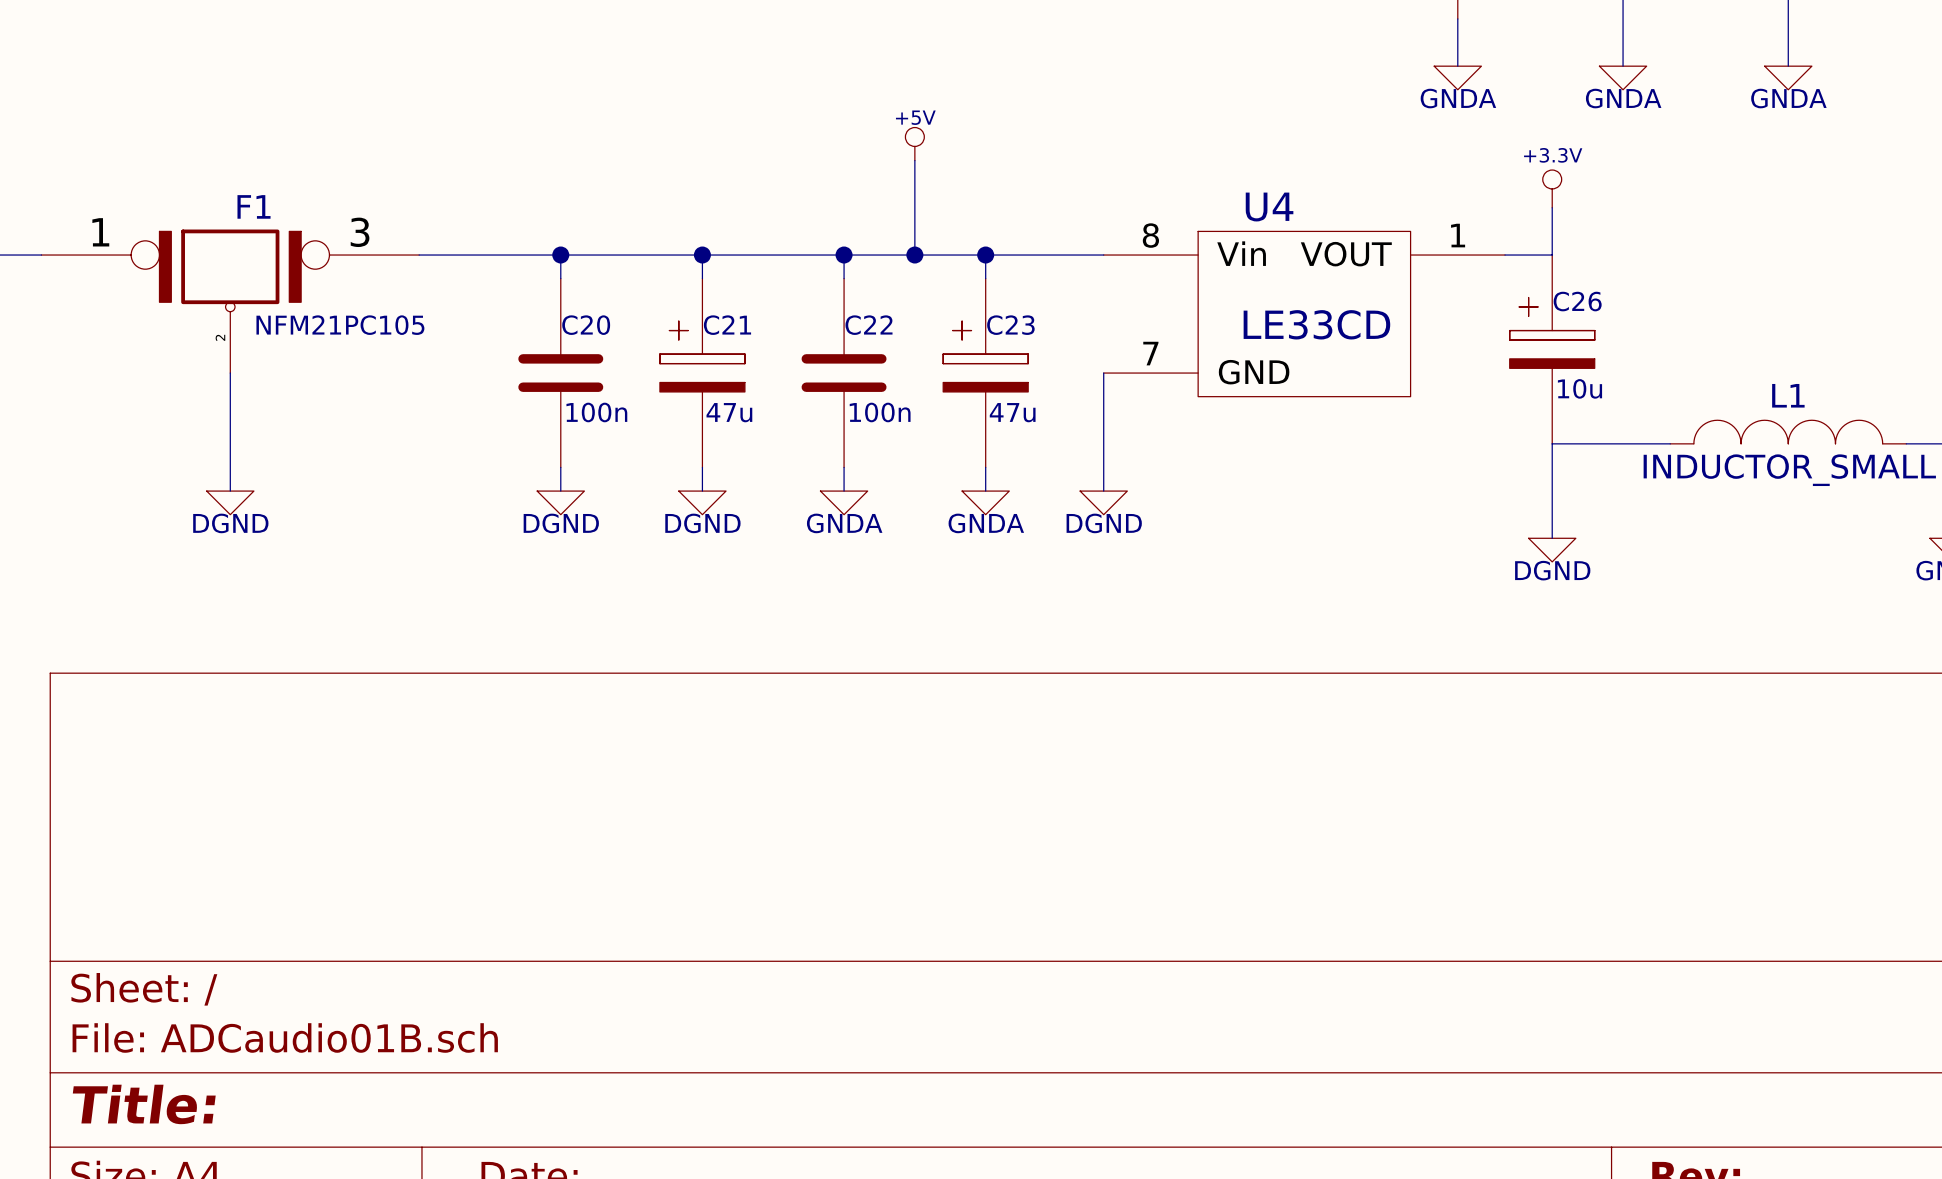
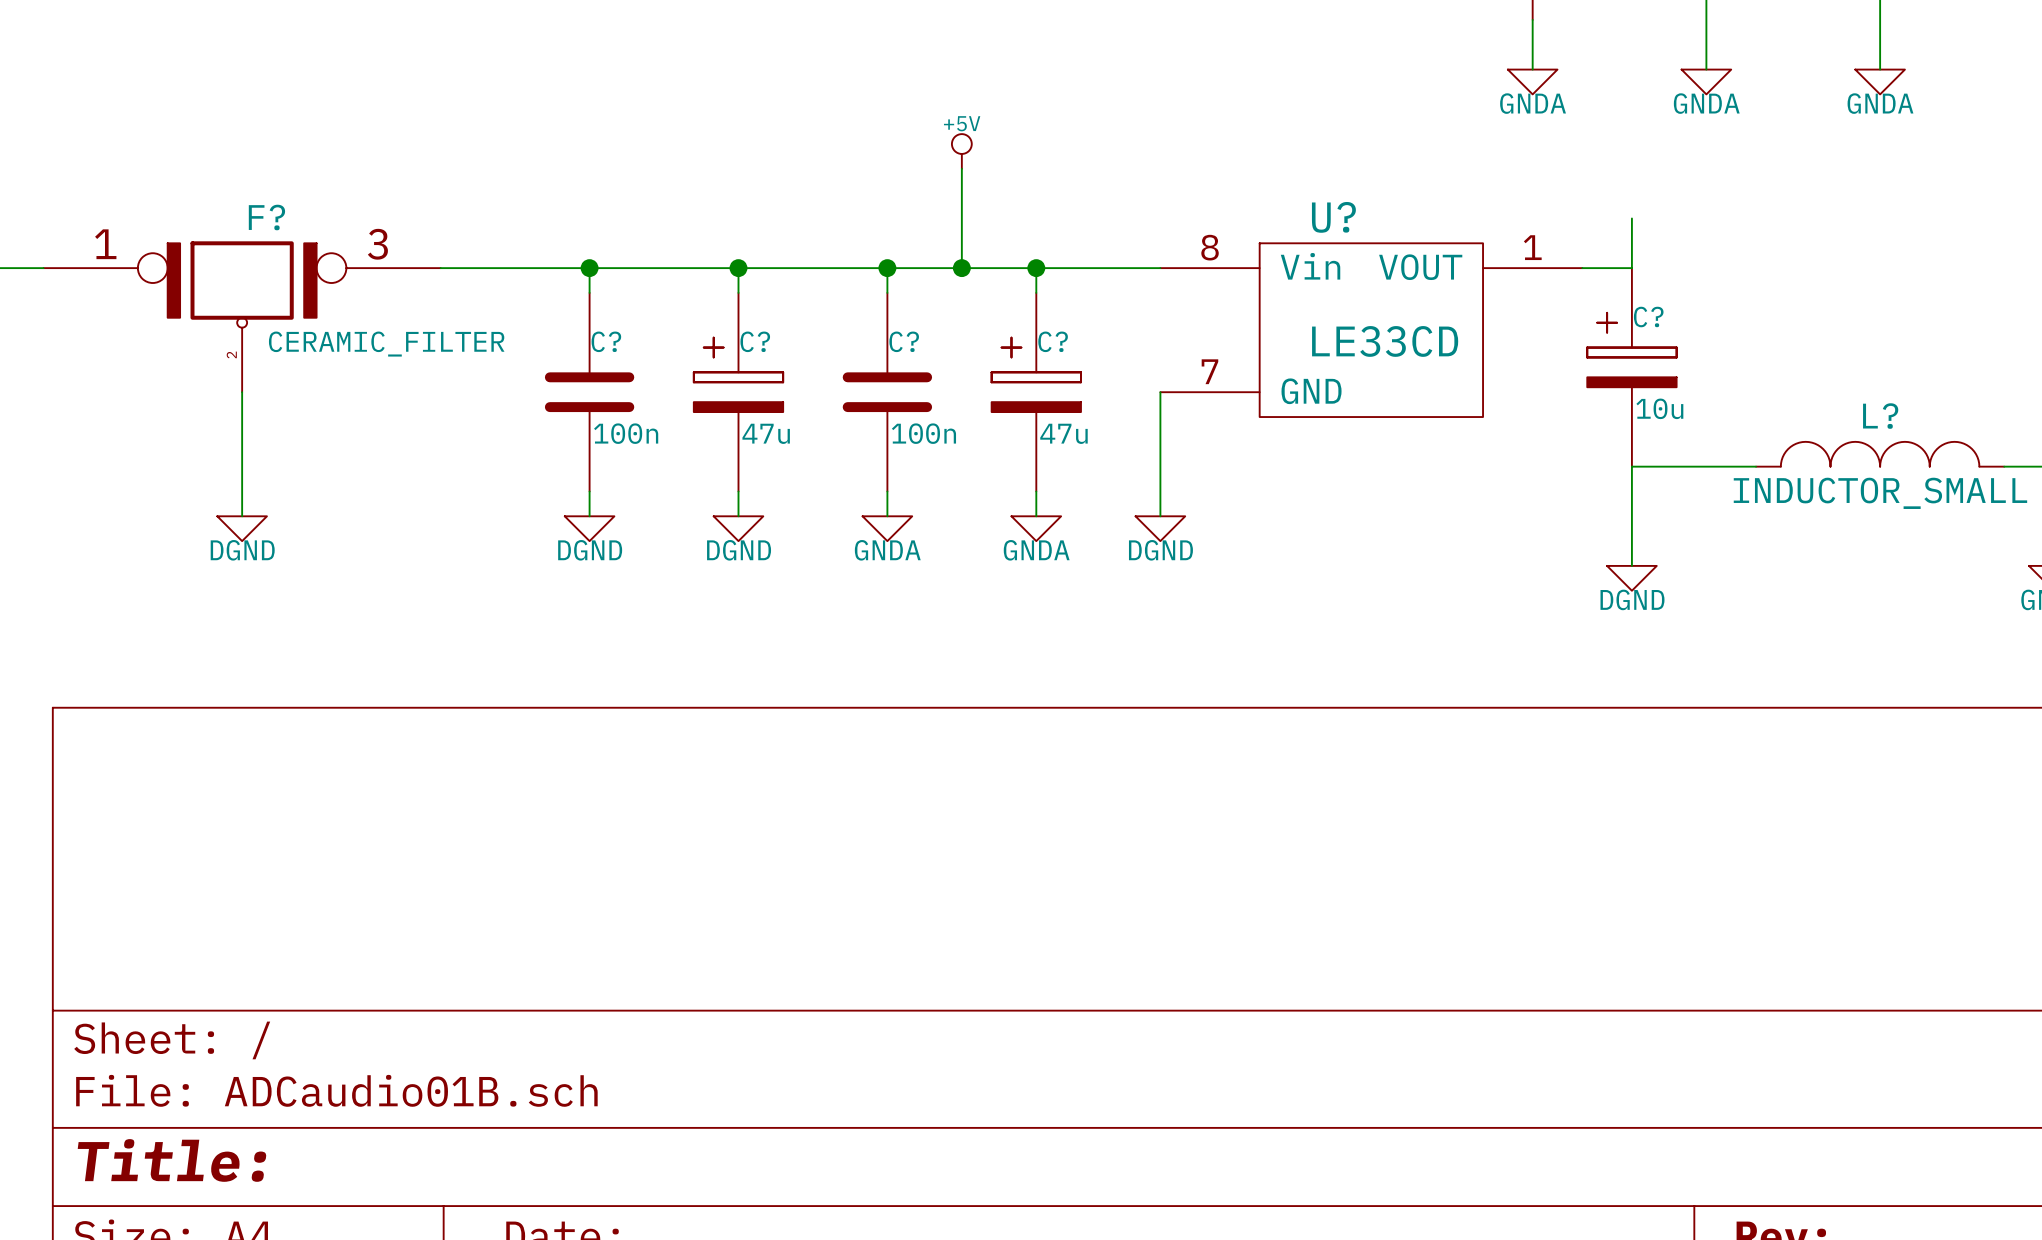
power symbol: +3.3V (1552, 188) -> none
F1 name: F1 (254, 206) -> F? (266, 217)
U4 name: U4 (1269, 207) -> U? (1333, 217)
C26 name: C26 (1577, 301) -> C? (1648, 317)
F1 value: NFM21PC105 (340, 325) -> CERAMIC_FILTER (386, 344)
C20 name: C20 (586, 325) -> C? (606, 341)
C21 name: C21 (727, 325) -> C? (755, 341)
C22 name: C22 (869, 325) -> C? (904, 341)
C23 name: C23 (1010, 325) -> C? (1053, 341)
L1 name: L1 (1788, 395) -> L? (1880, 416)

